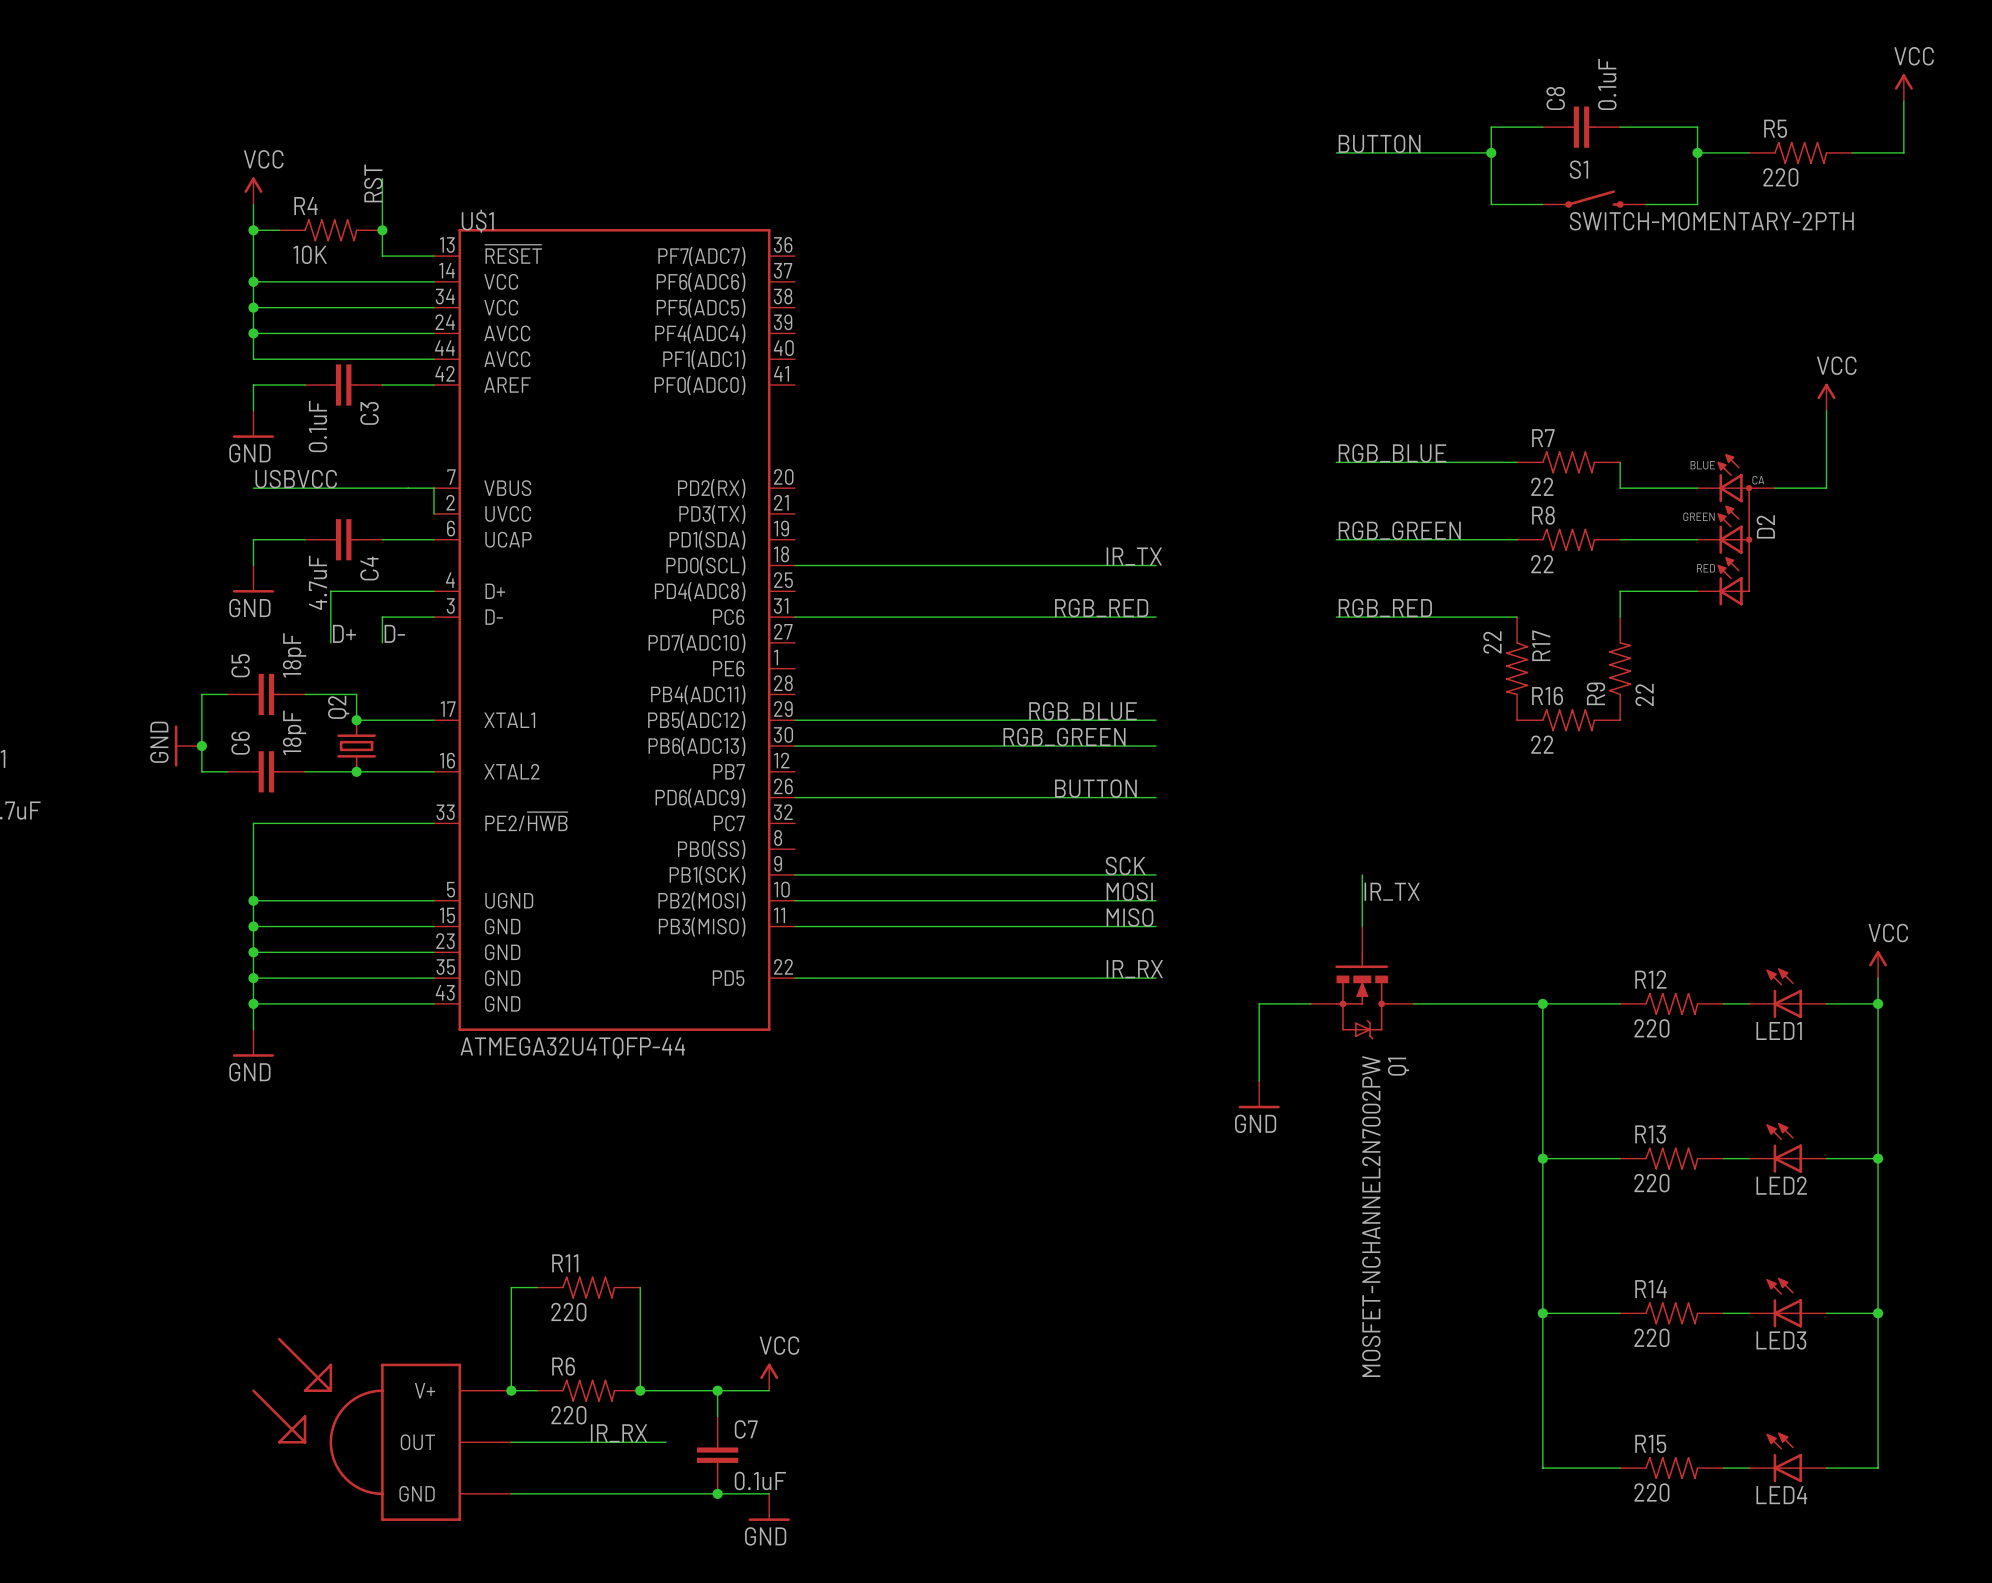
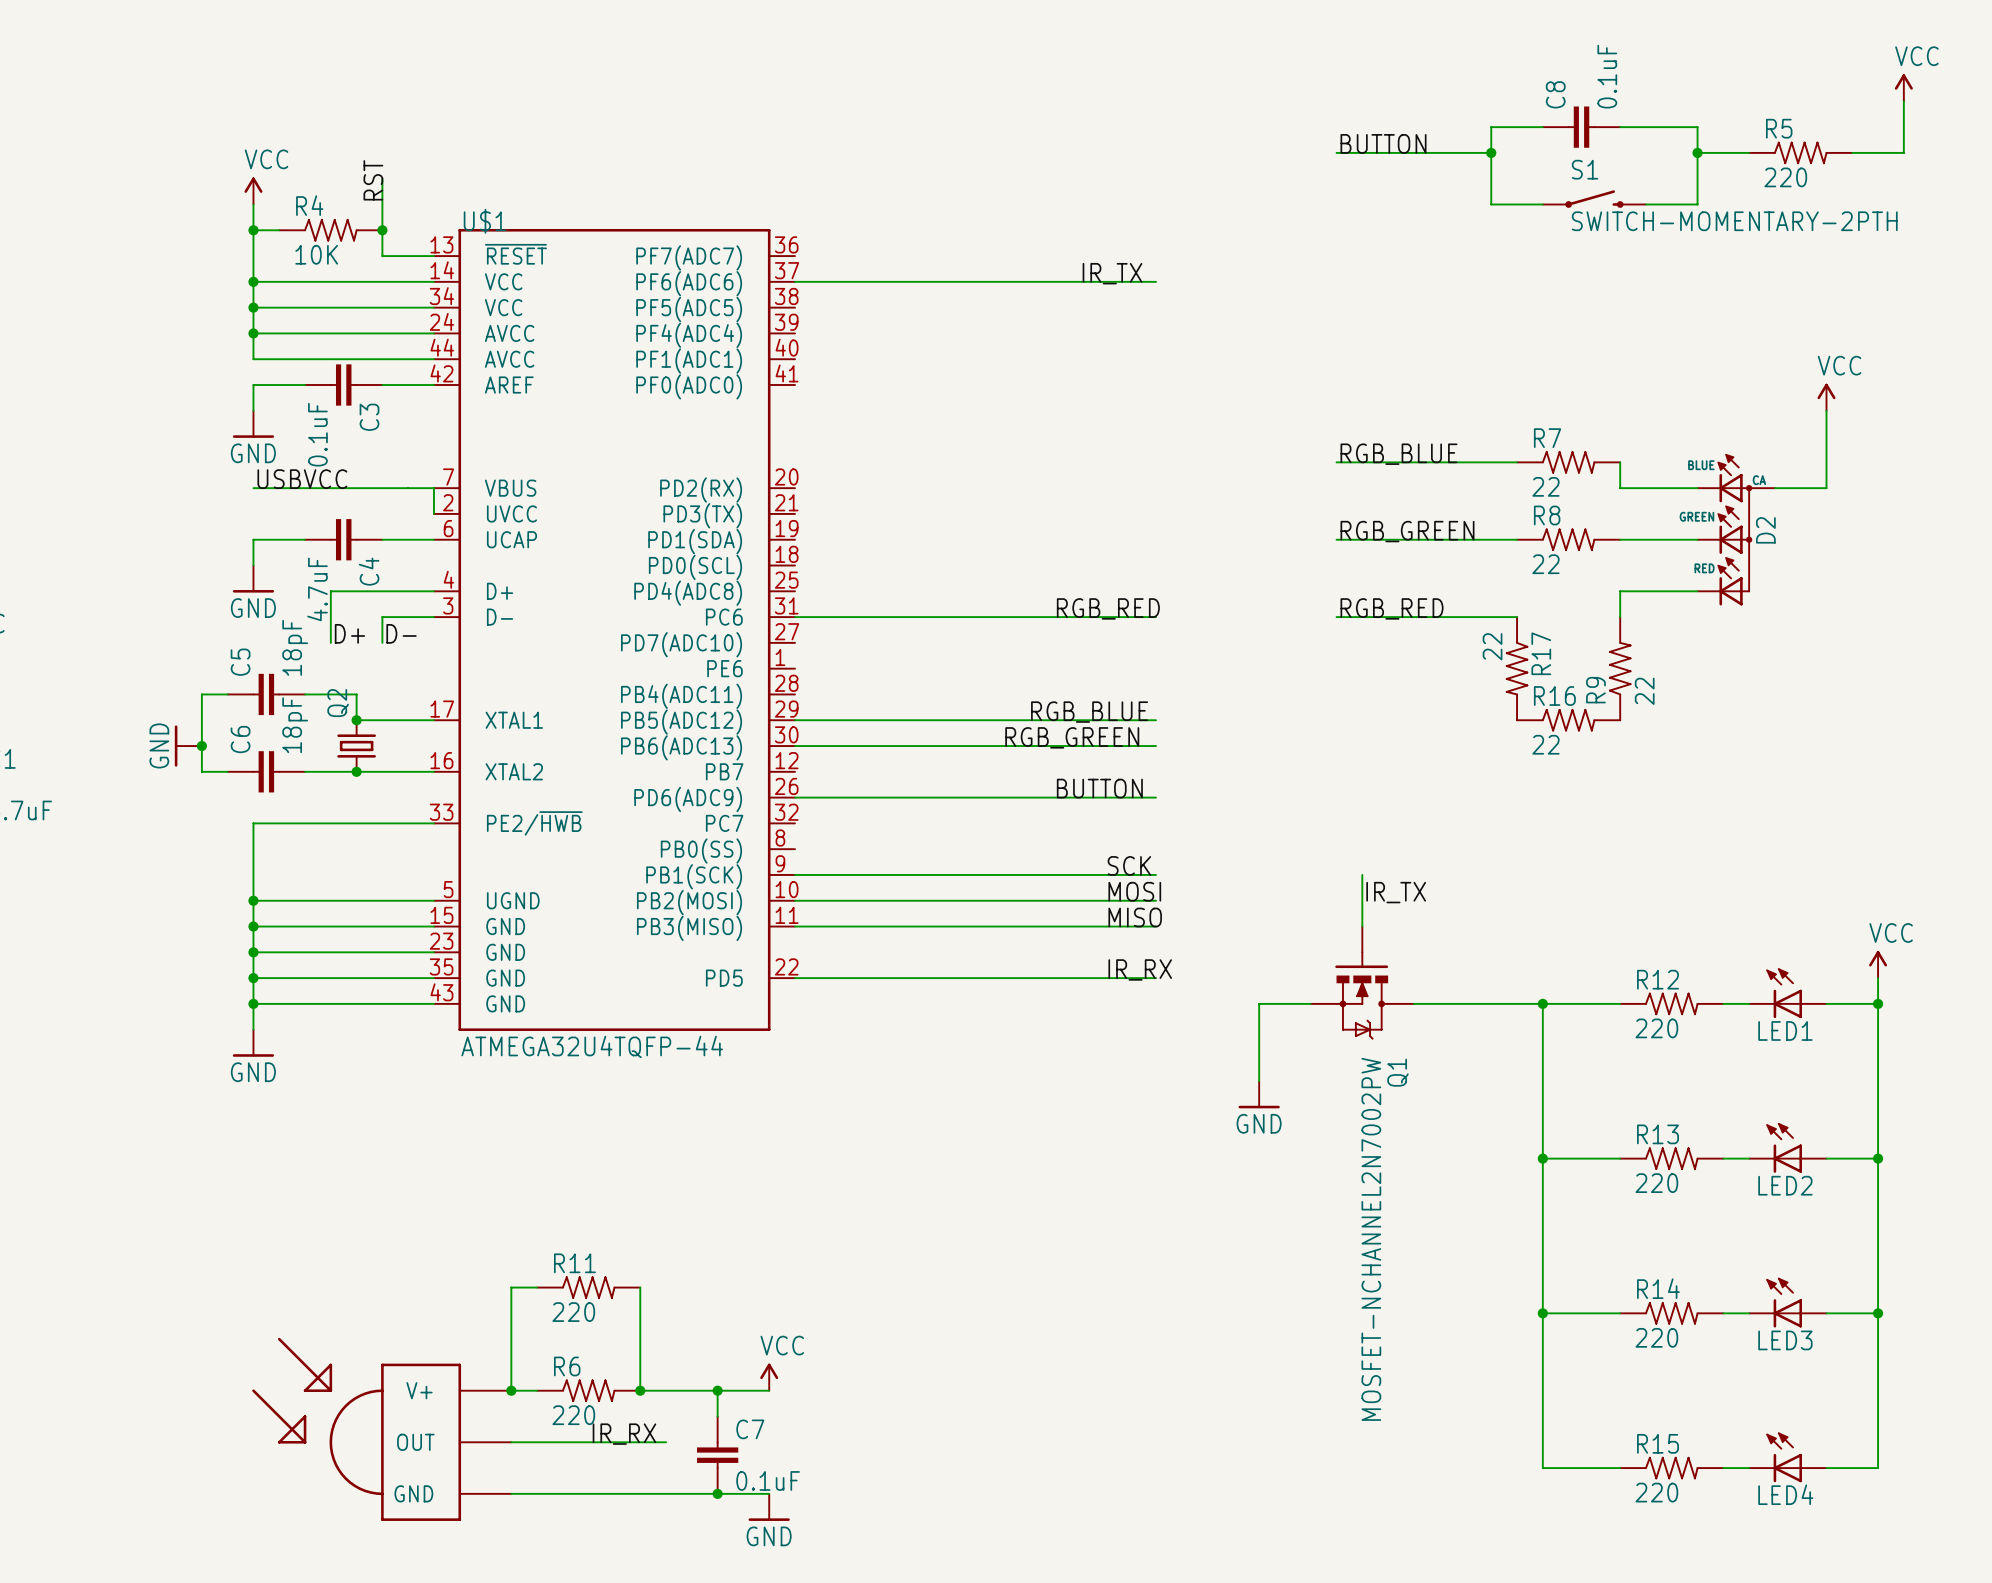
label: none -> IR_TX (1112, 273)
wire: none -> (795, 281) (1156, 281)
label: IR_TX (1134, 556) -> none
wire: (795, 565) (1156, 565) -> none

